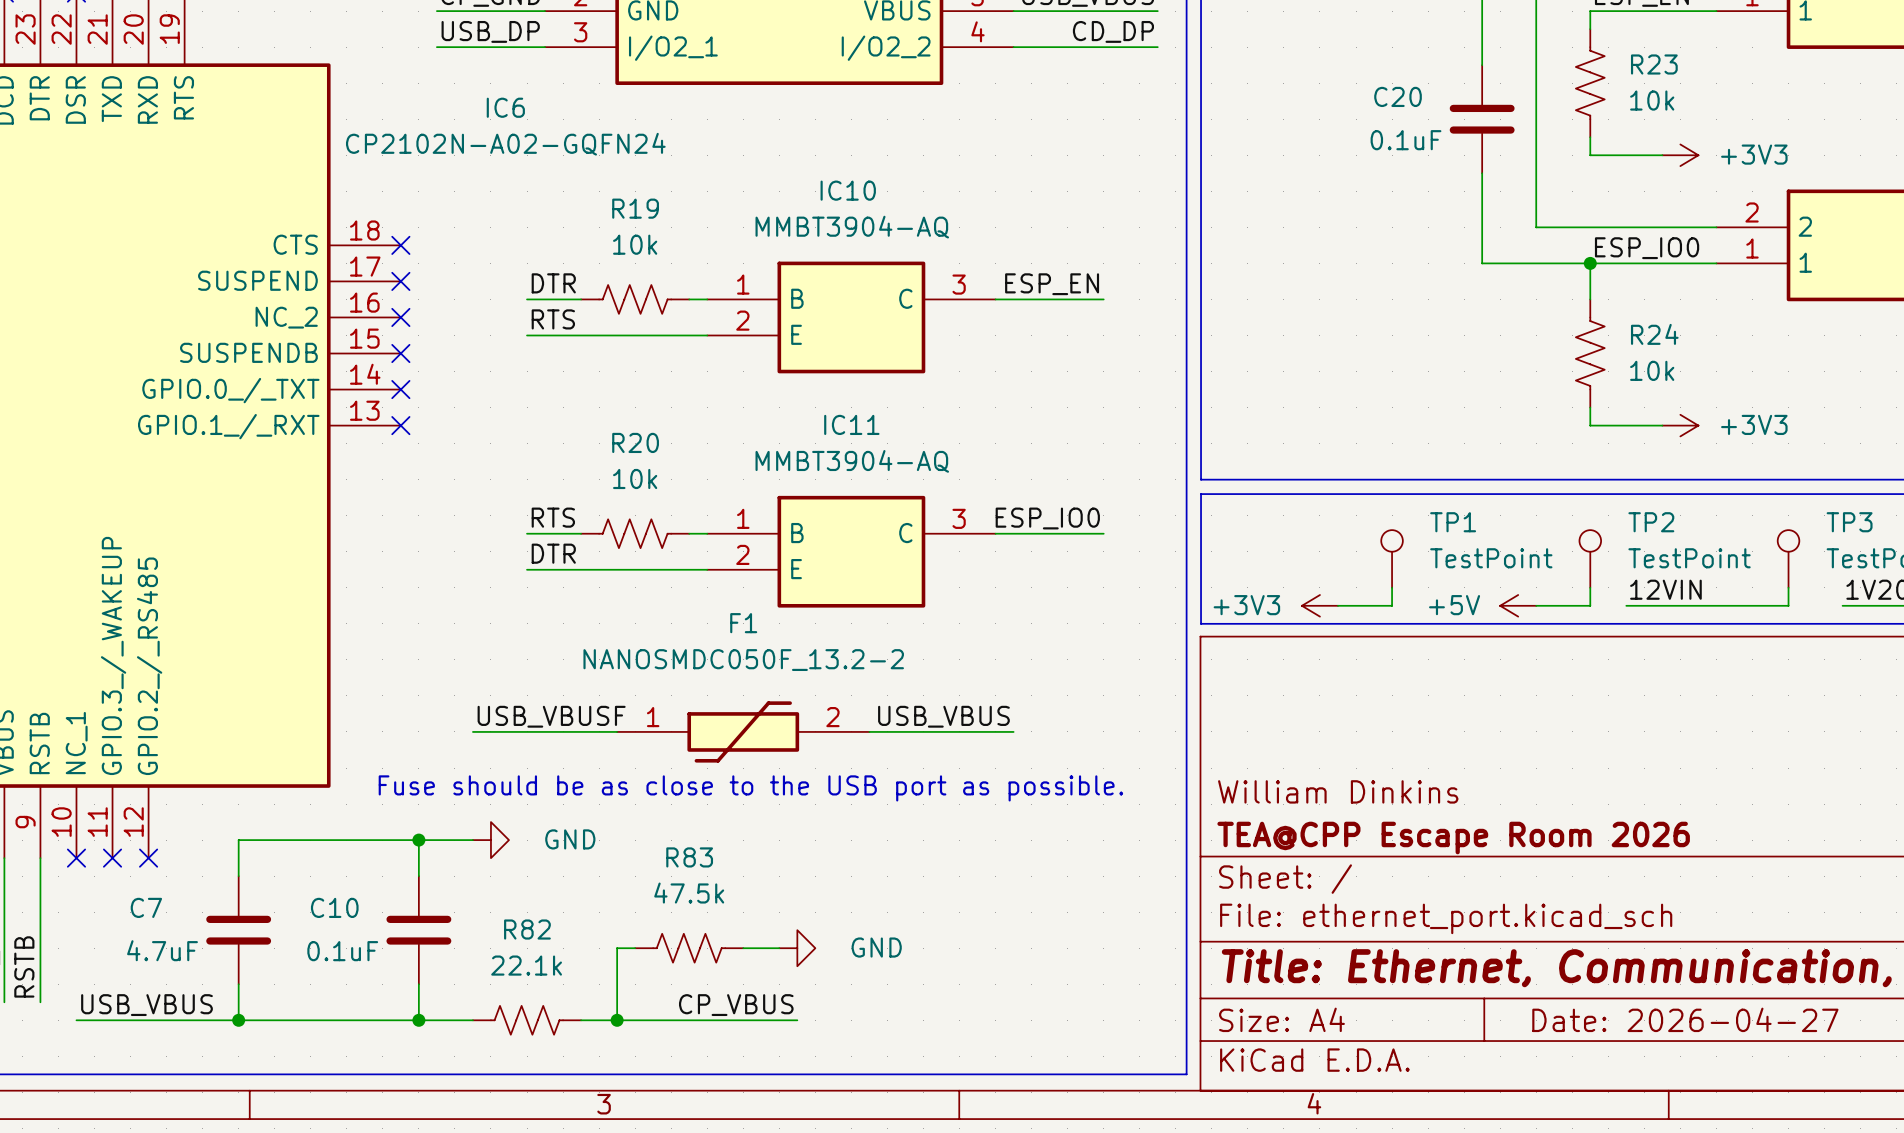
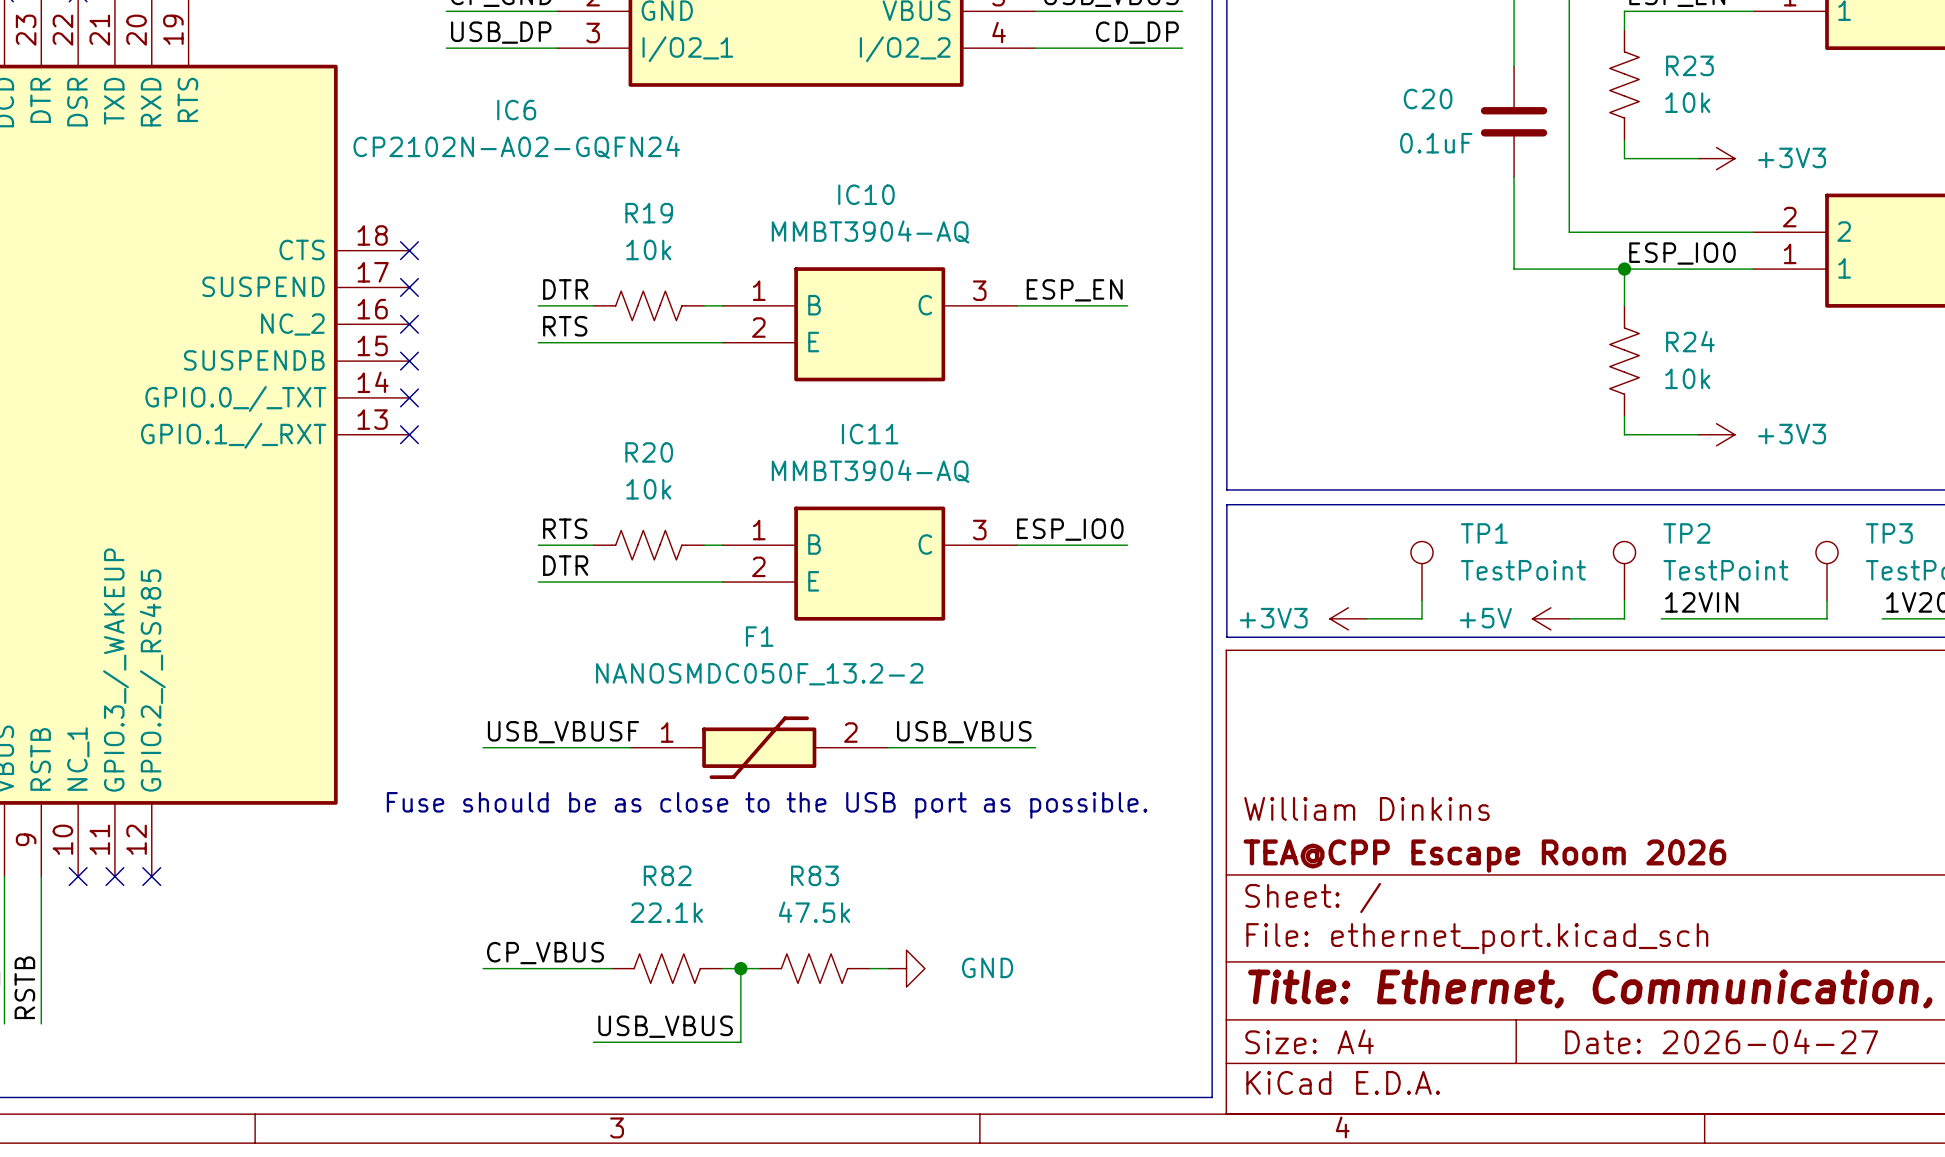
wire: (418, 840) (418, 876) -> none
junction: (418, 840) -> none
wire: (472, 840) (238, 840) (238, 876) -> none
power symbol: GND (490, 840) -> none
C7: 4.7uF (238, 930) -> none
C10: 0.1uF (418, 930) -> none
wire: none -> (483, 968) (611, 968)
wire: (635, 948) (617, 948) (617, 1020) -> none
R83 position: (689, 948) -> (814, 968)
junction: none -> (740, 968)
power symbol position: GND (797, 948) -> GND (906, 968)
wire: none -> (869, 968) (888, 968)
wire: (238, 984) (238, 1020) -> none
wire: (418, 984) (418, 1020) -> none
label: USB_VBUS (146, 1005) -> none
label: none -> USB_VBUS (665, 1026)
label position: CP_VBUS (736, 1005) -> CP_VBUS (545, 953)
wire: (76, 1020) (472, 1020) -> none
junction: (238, 1020) -> none
junction: (418, 1020) -> none
R82 position: (527, 1020) -> (667, 968)
junction: (617, 1020) -> none
wire: (725, 1020) (797, 1020) -> (740, 1042) (740, 968)

